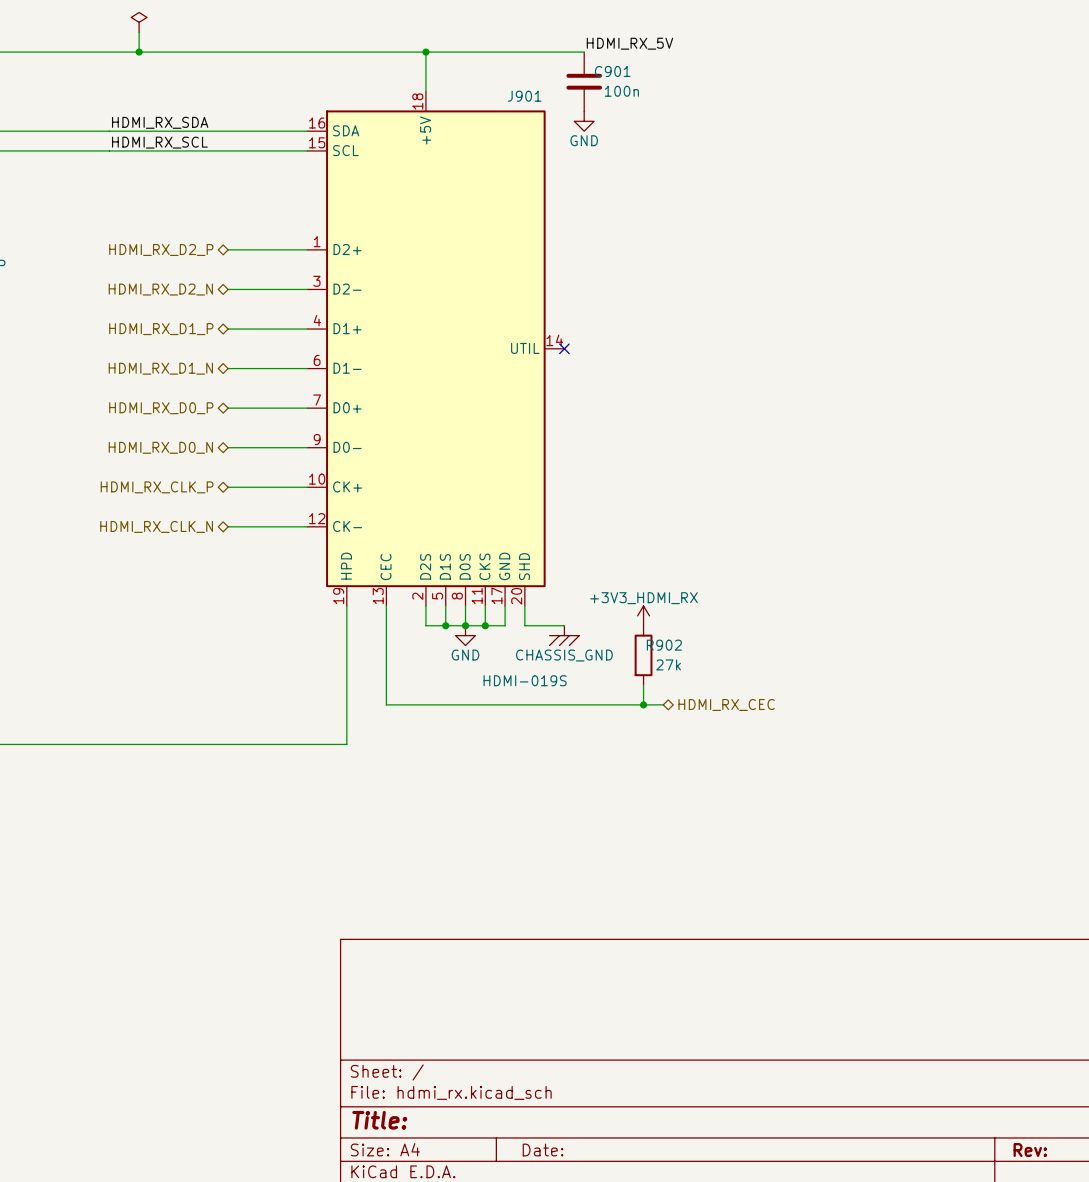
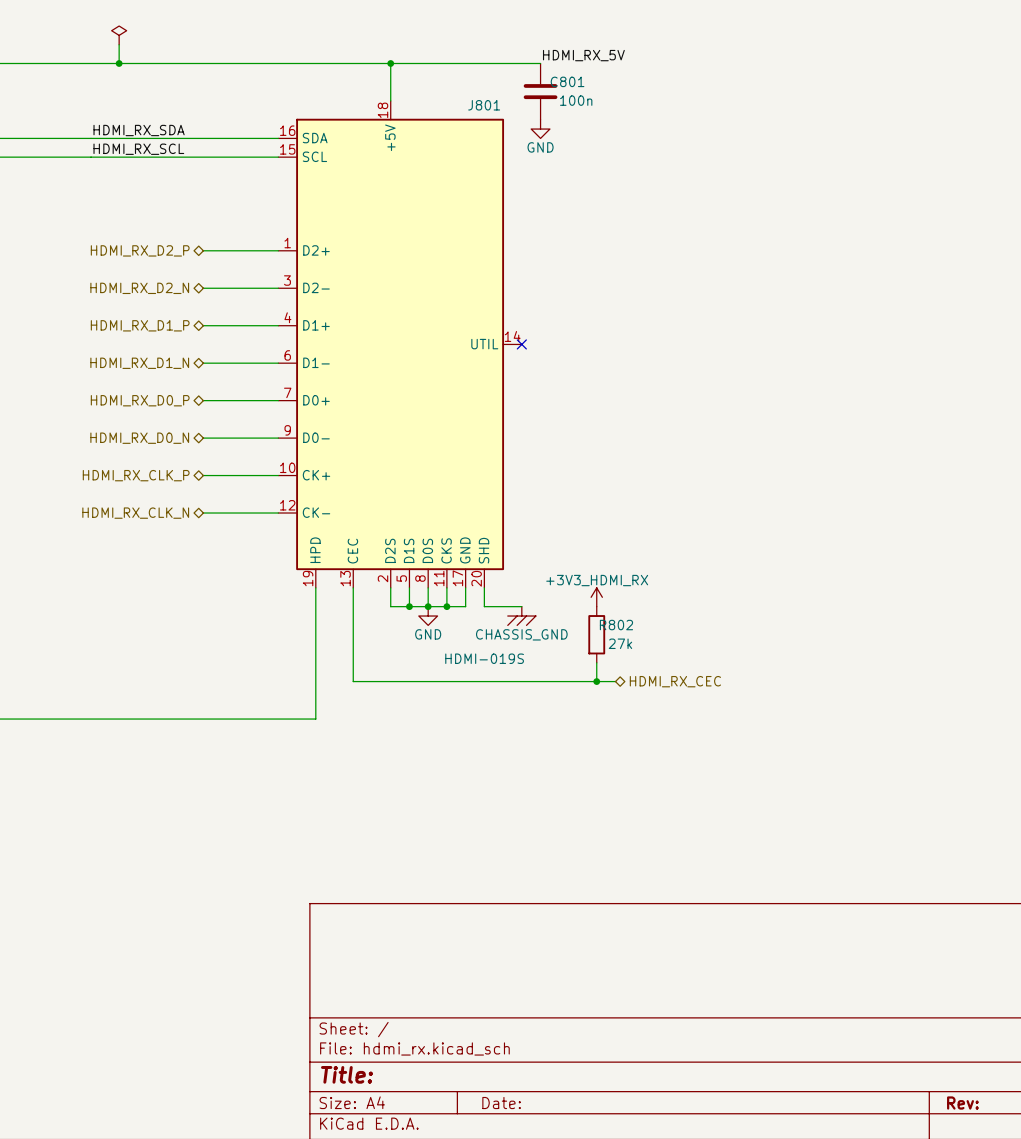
C901 name: C901 (612, 71) -> C801 (567, 81)
J901 name: J901 (524, 96) -> J801 (484, 105)
R902 name: R902 (664, 645) -> R802 (616, 625)

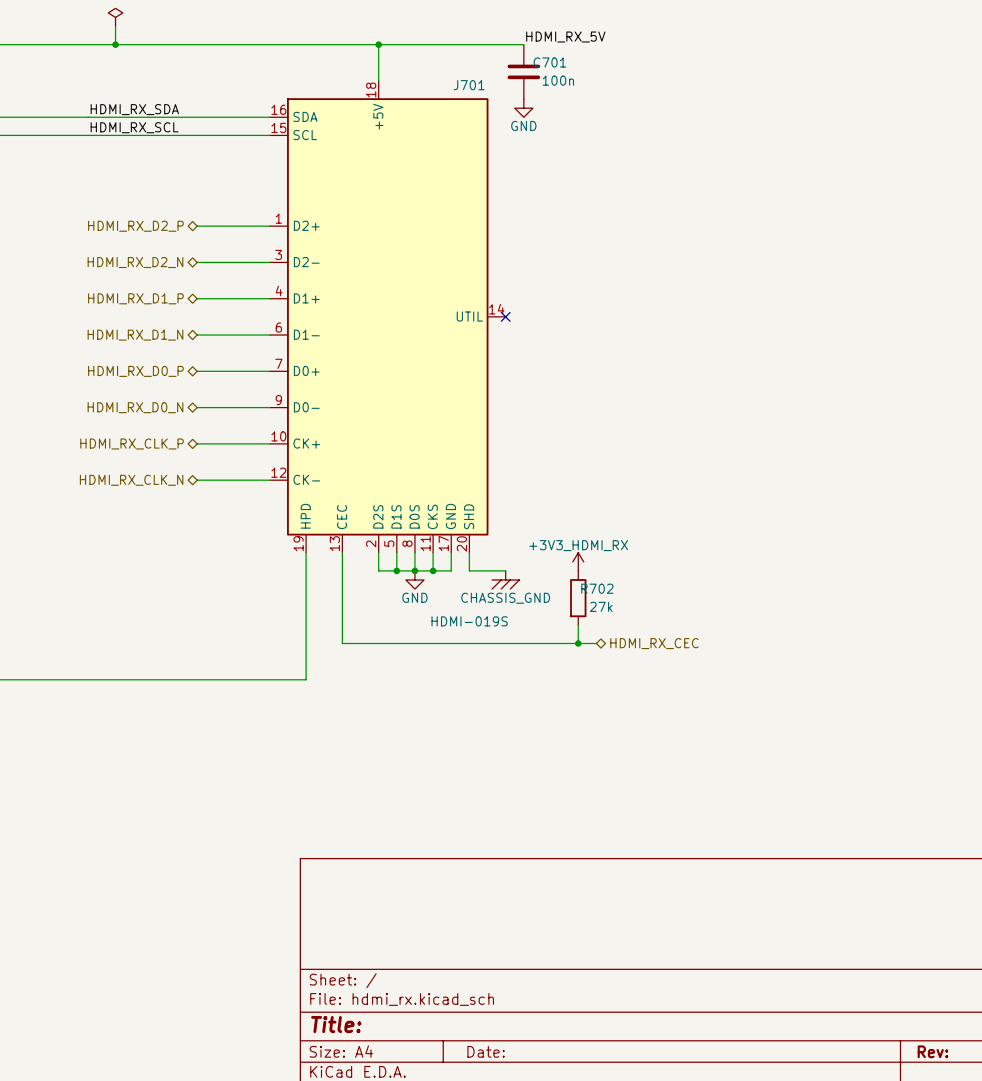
C801 name: C801 (567, 81) -> C701 (549, 62)
J801 name: J801 (484, 105) -> J701 (469, 85)
R802 name: R802 (616, 625) -> R702 (597, 588)

